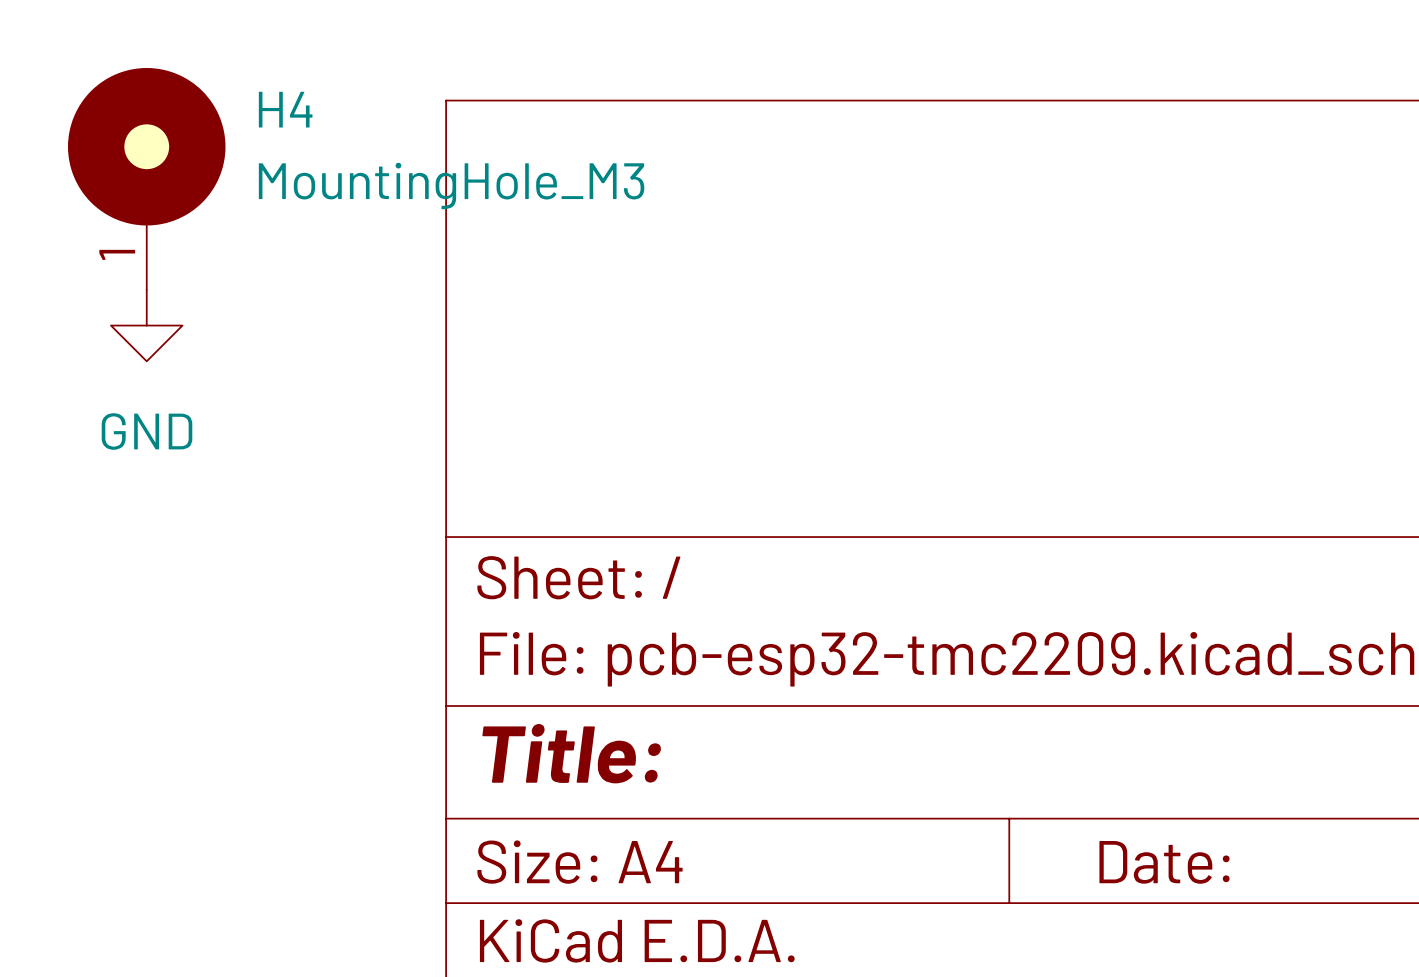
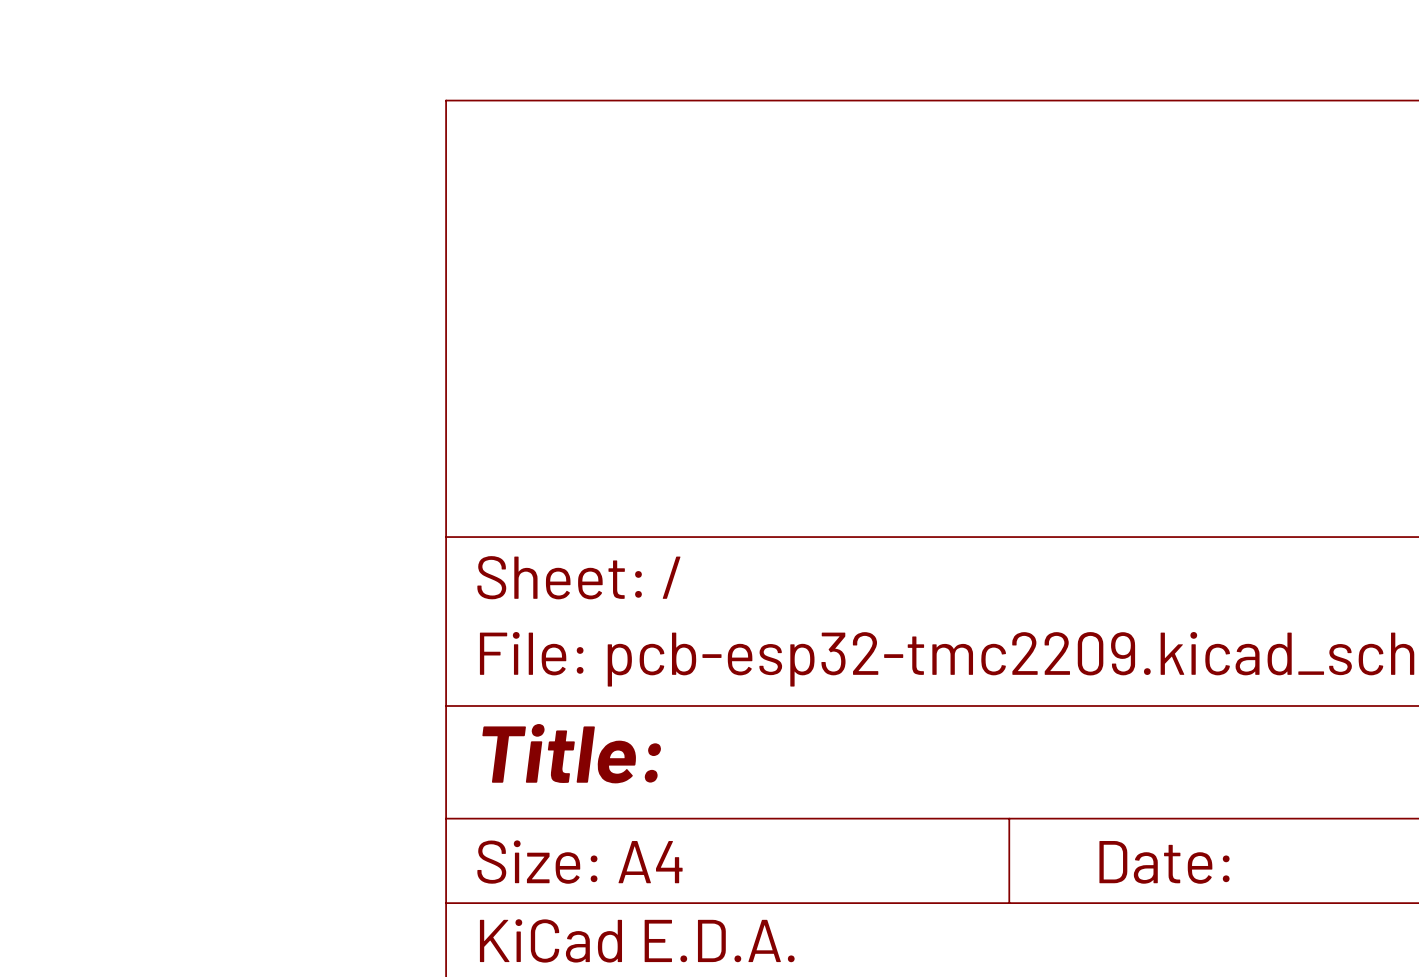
H4: MountingHole_M3 (146, 178) -> none
power symbol: GND (146, 325) -> none

